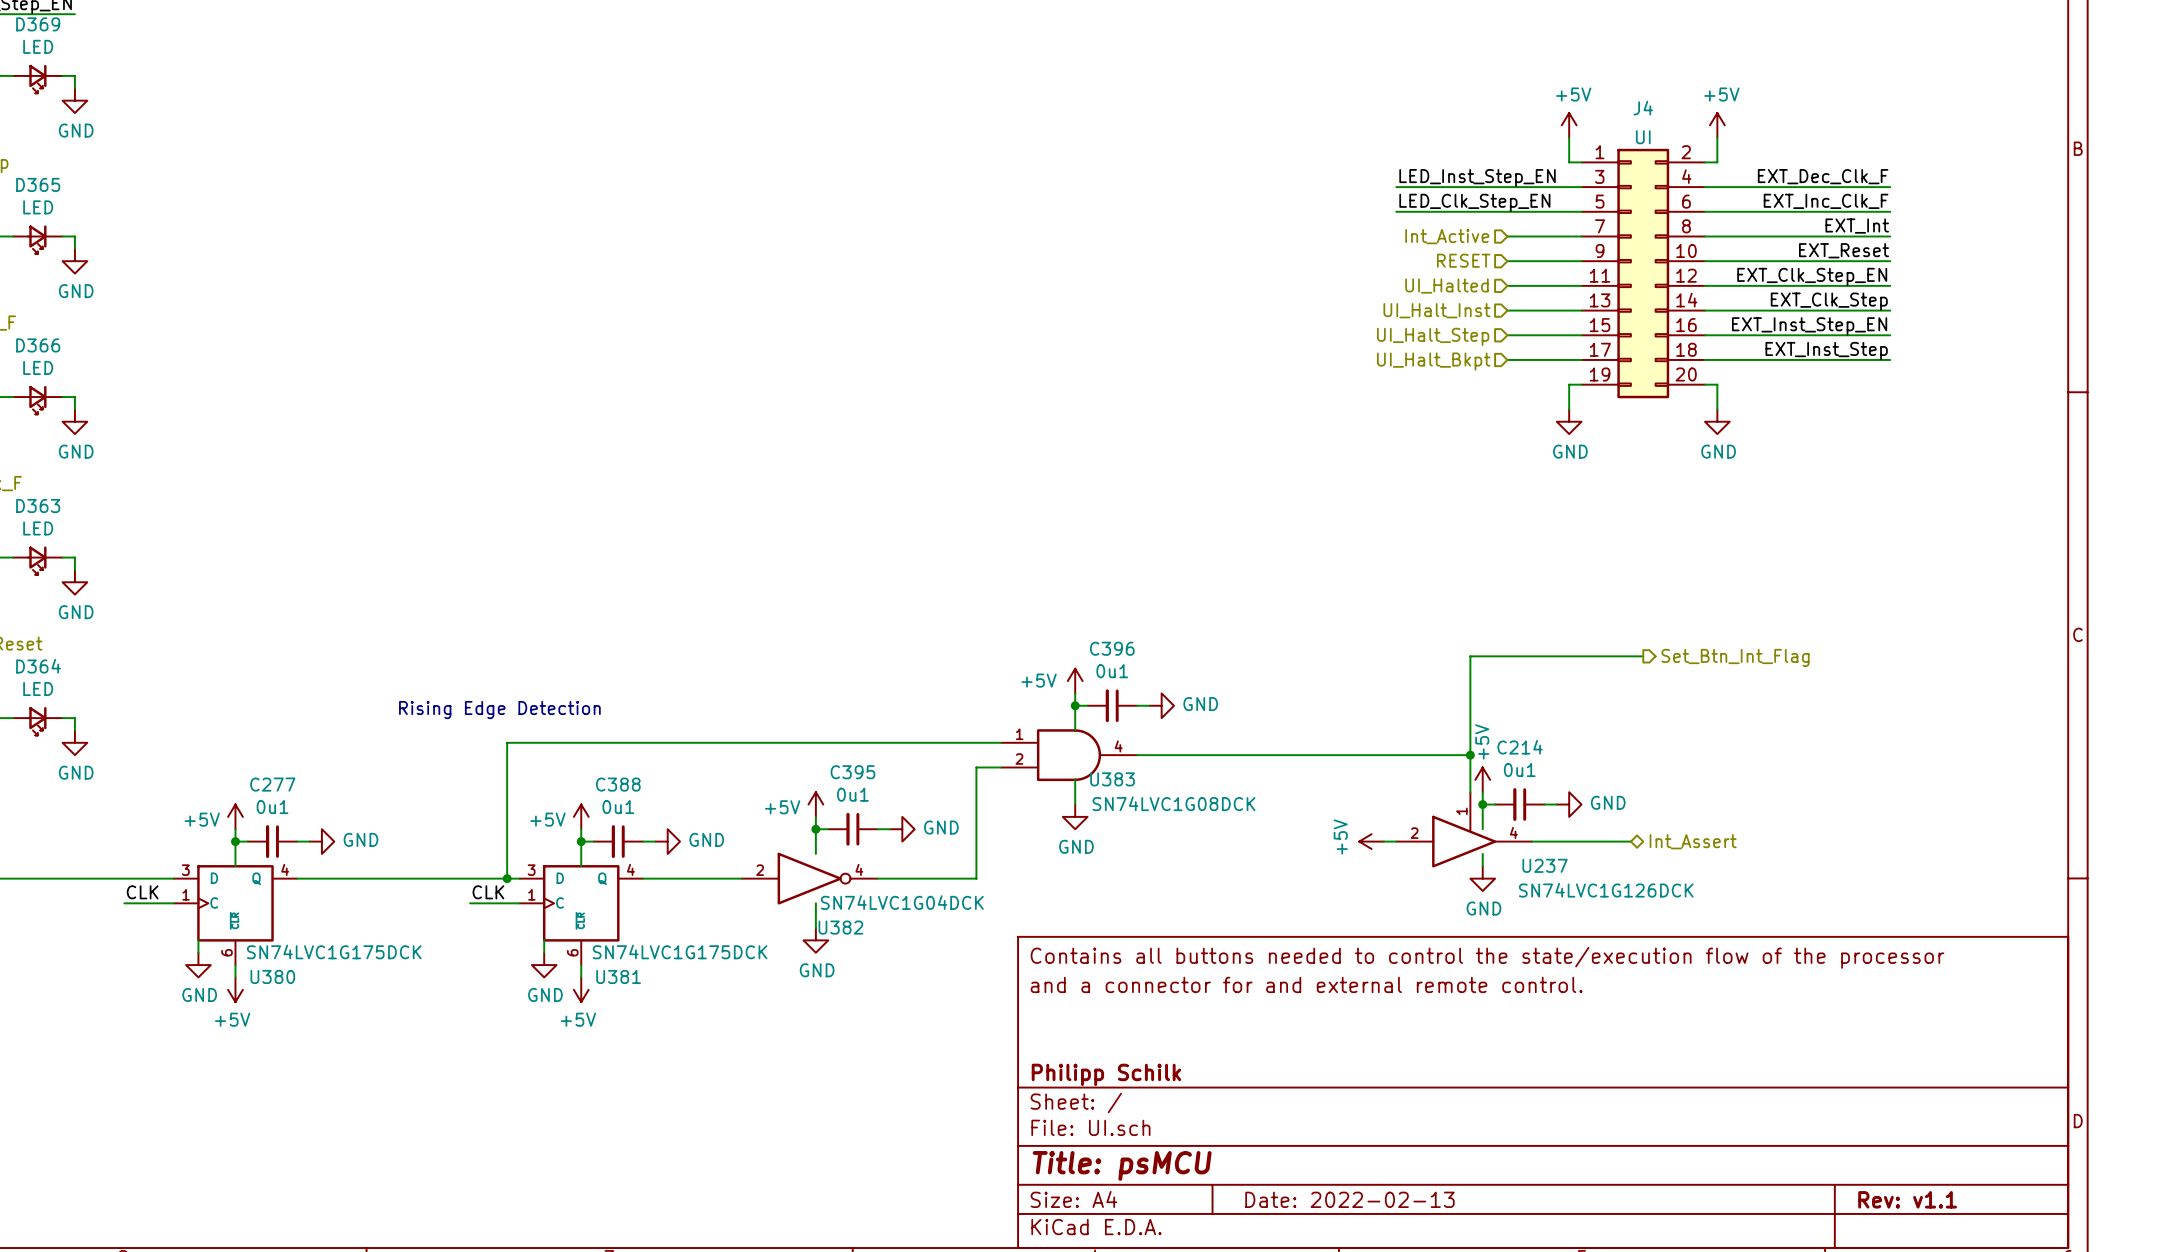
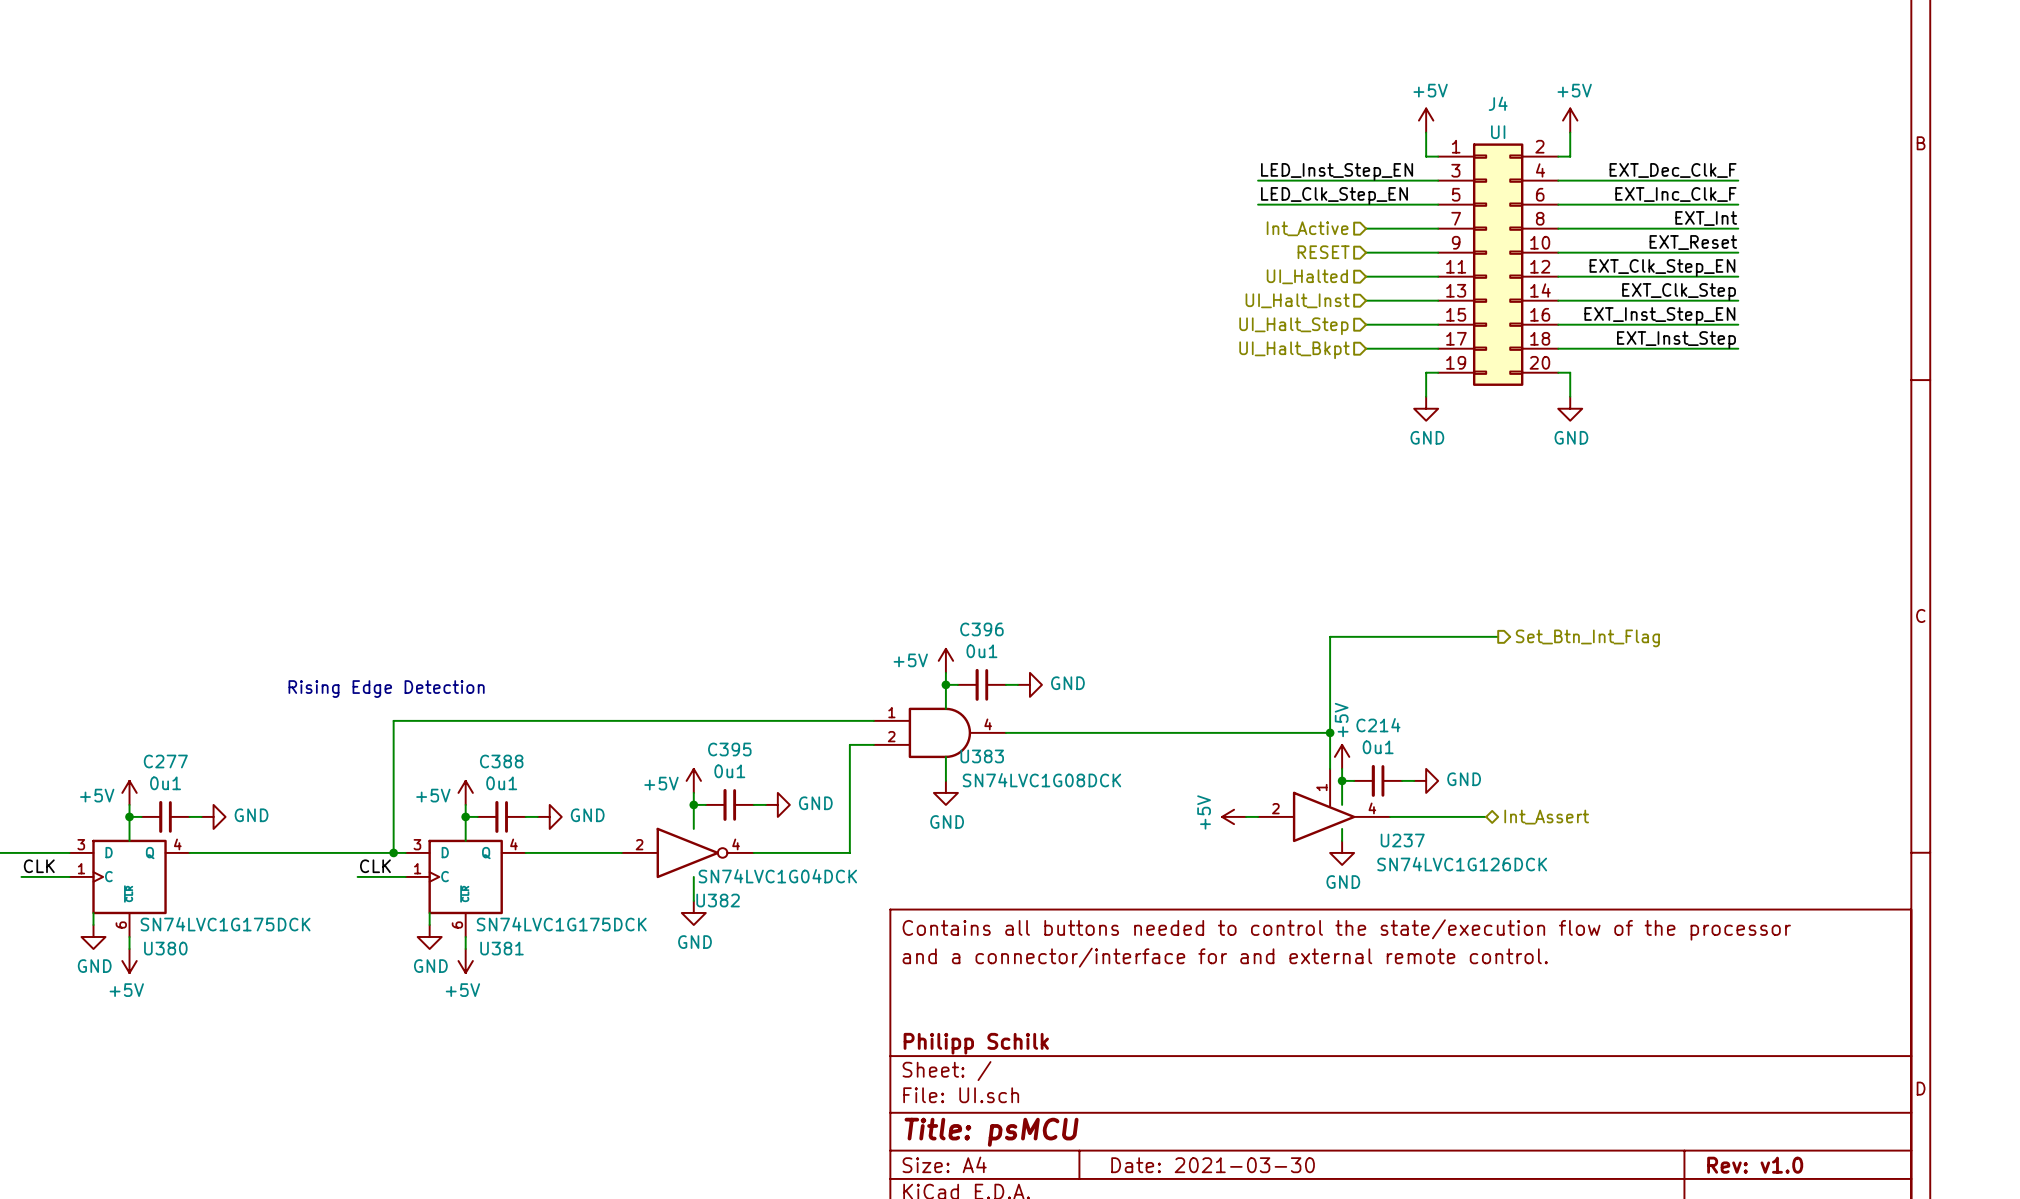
title block: and a connector for and external remote control. (1306, 984) -> and a connector/interface for and external remote control. (1225, 957)
title block: Date: 2022-02-13 (1349, 1199) -> Date: 2021-03-30 (1213, 1165)
title block: Rev: v1.1 (1907, 1199) -> Rev: v1.0 (1755, 1165)

